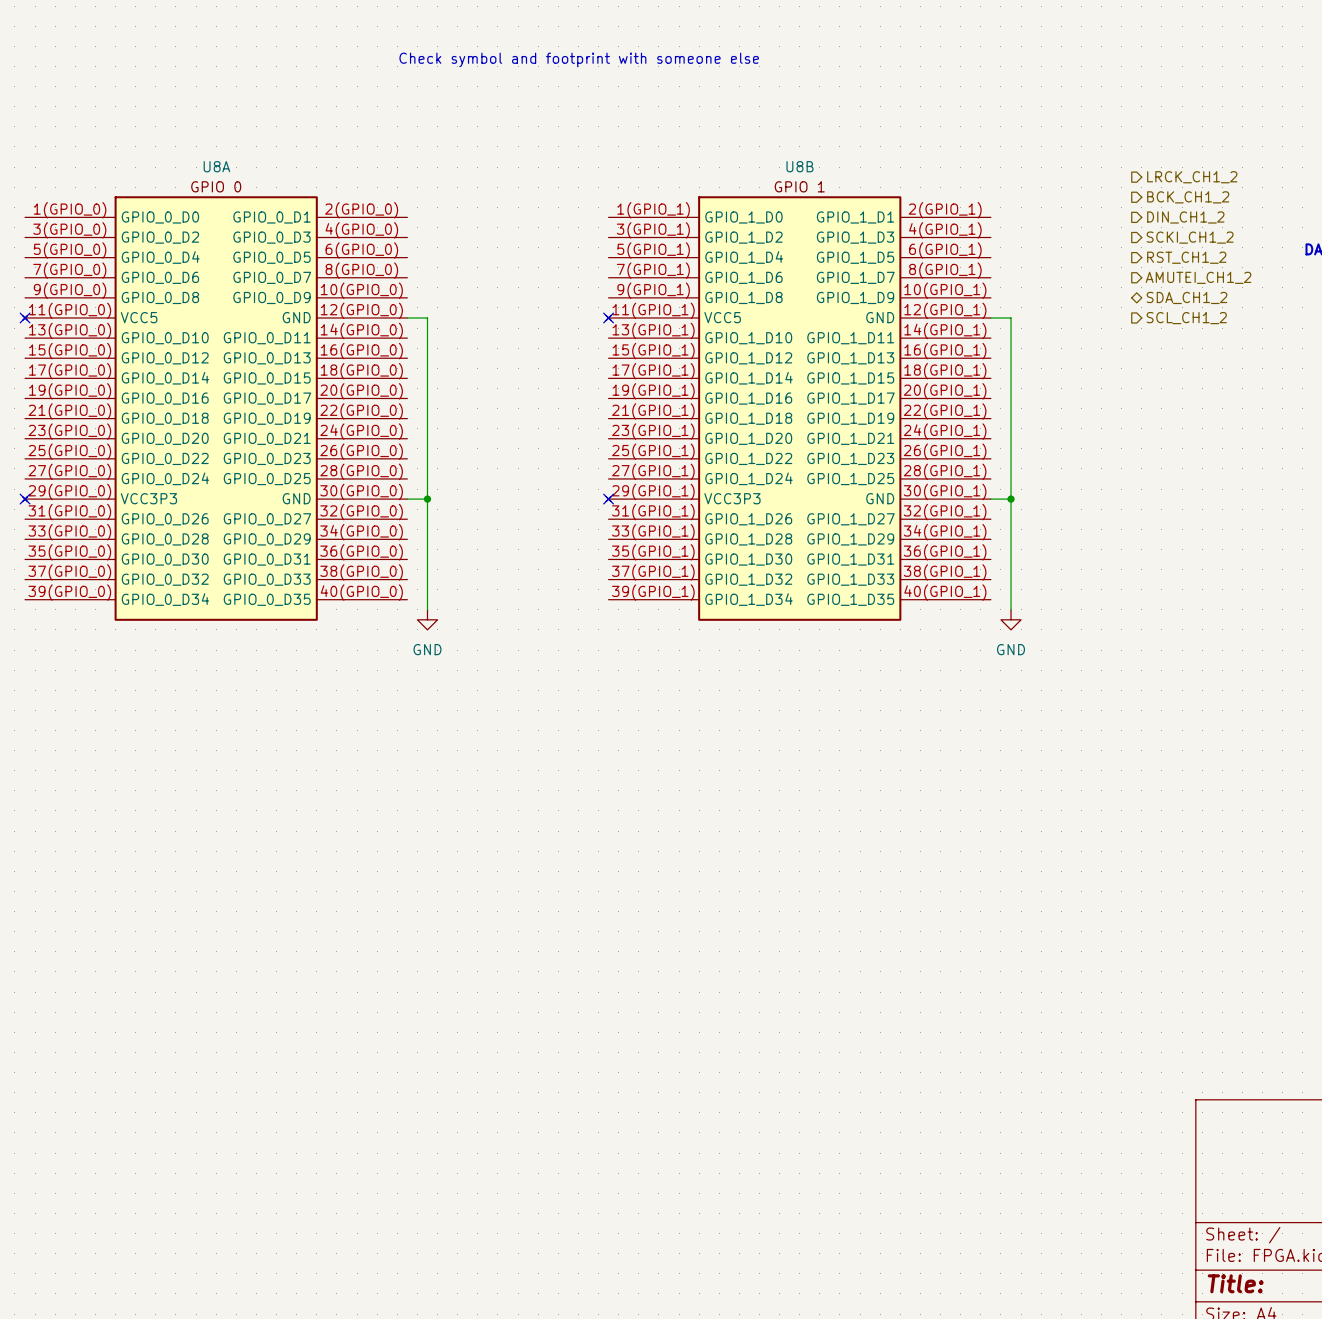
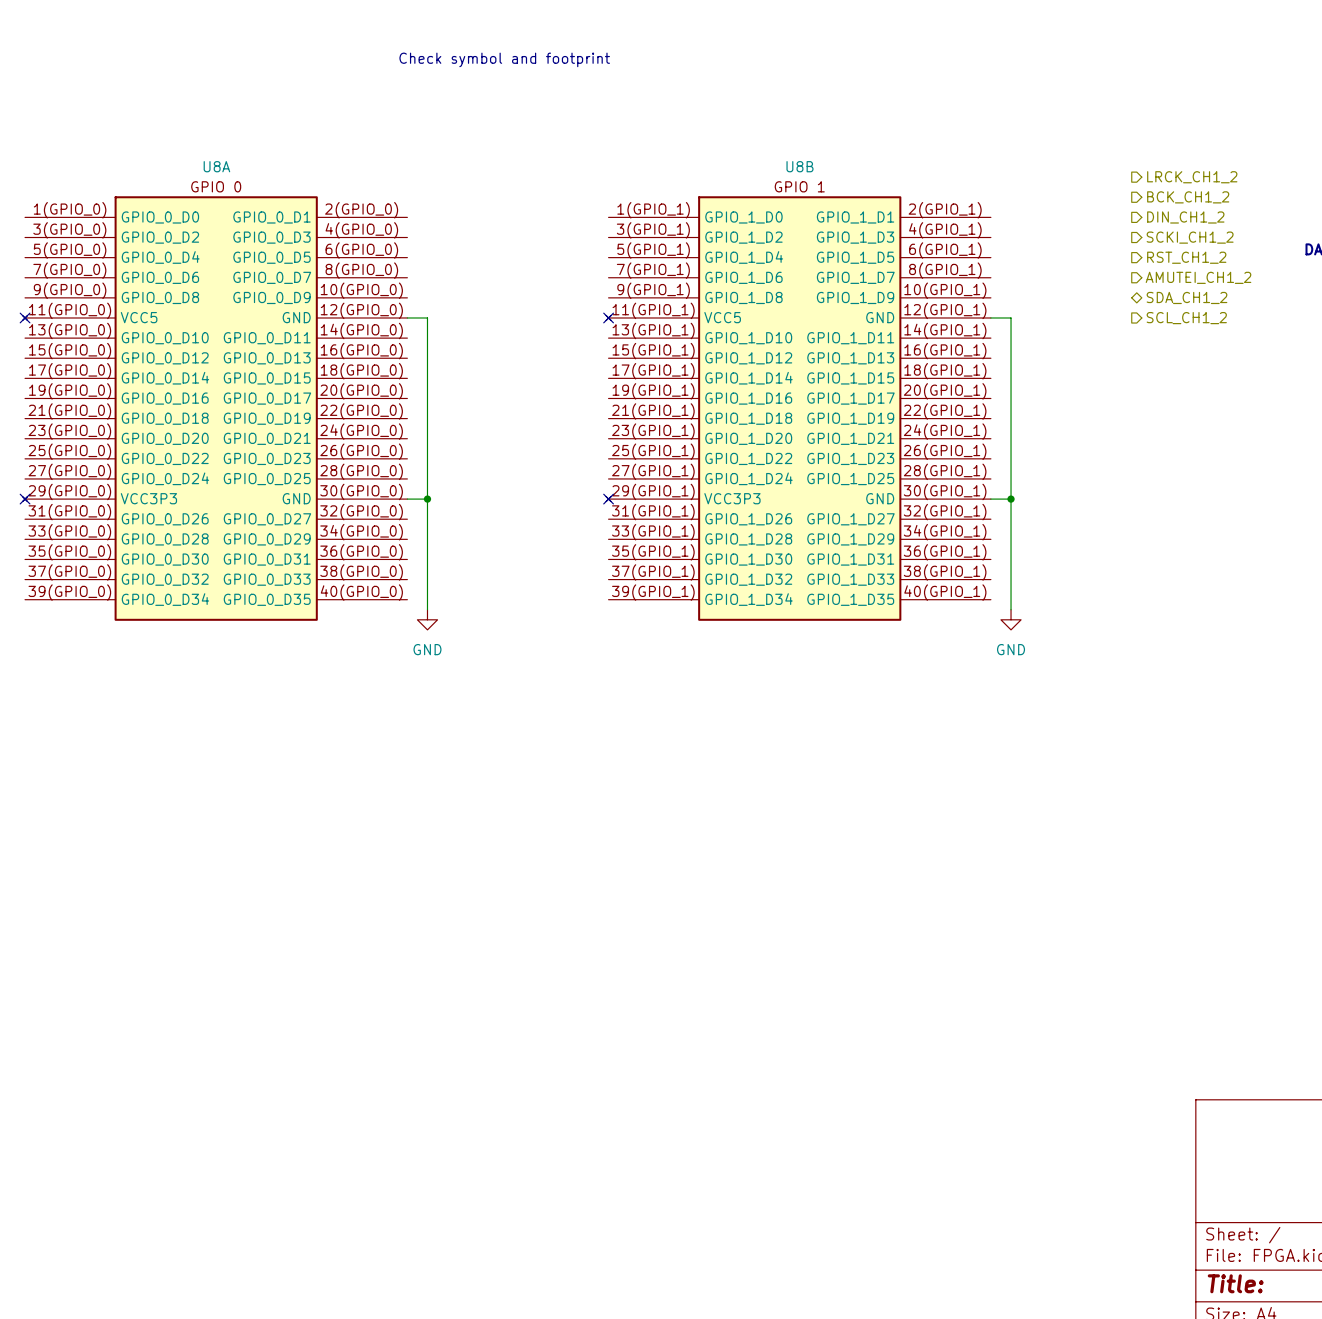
text: Check symbol and footprint with someone else (579, 59) -> Check symbol and footprint (504, 59)

